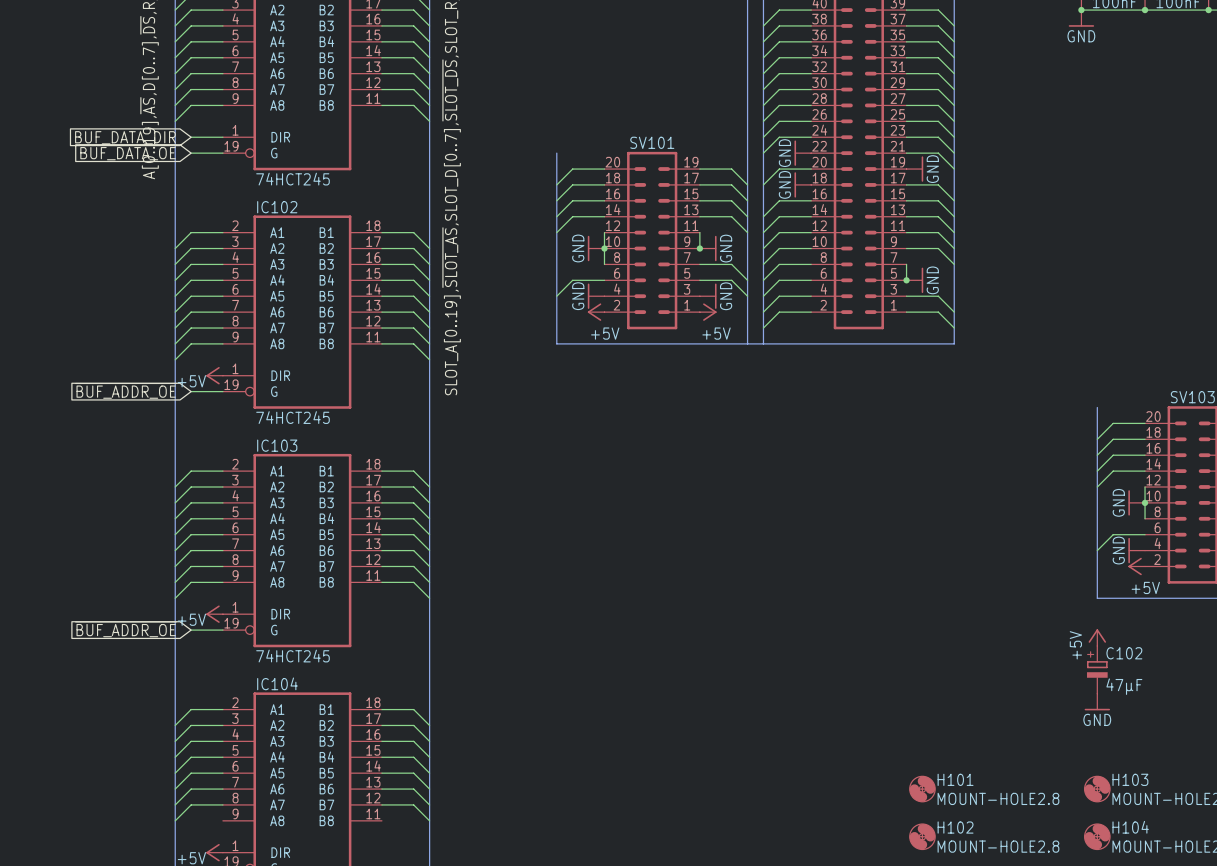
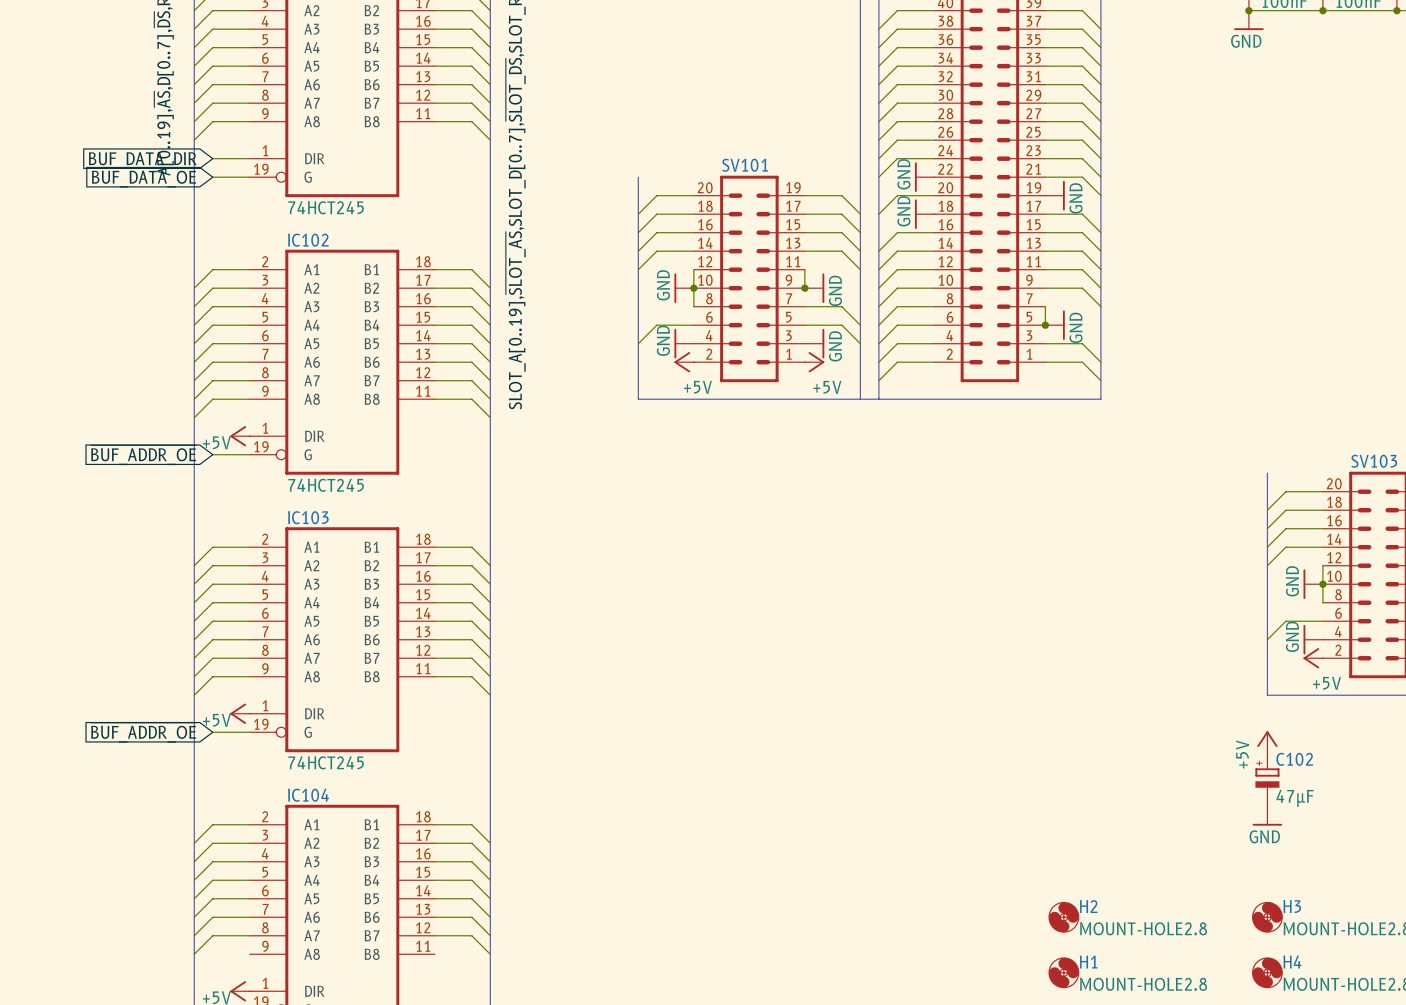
H101 name: H101 (955, 779) -> H2 (1088, 906)
H103 name: H103 (1130, 779) -> H3 (1292, 906)
H102 name: H102 (955, 827) -> H1 (1088, 962)
H104 name: H104 (1130, 827) -> H4 (1292, 962)

